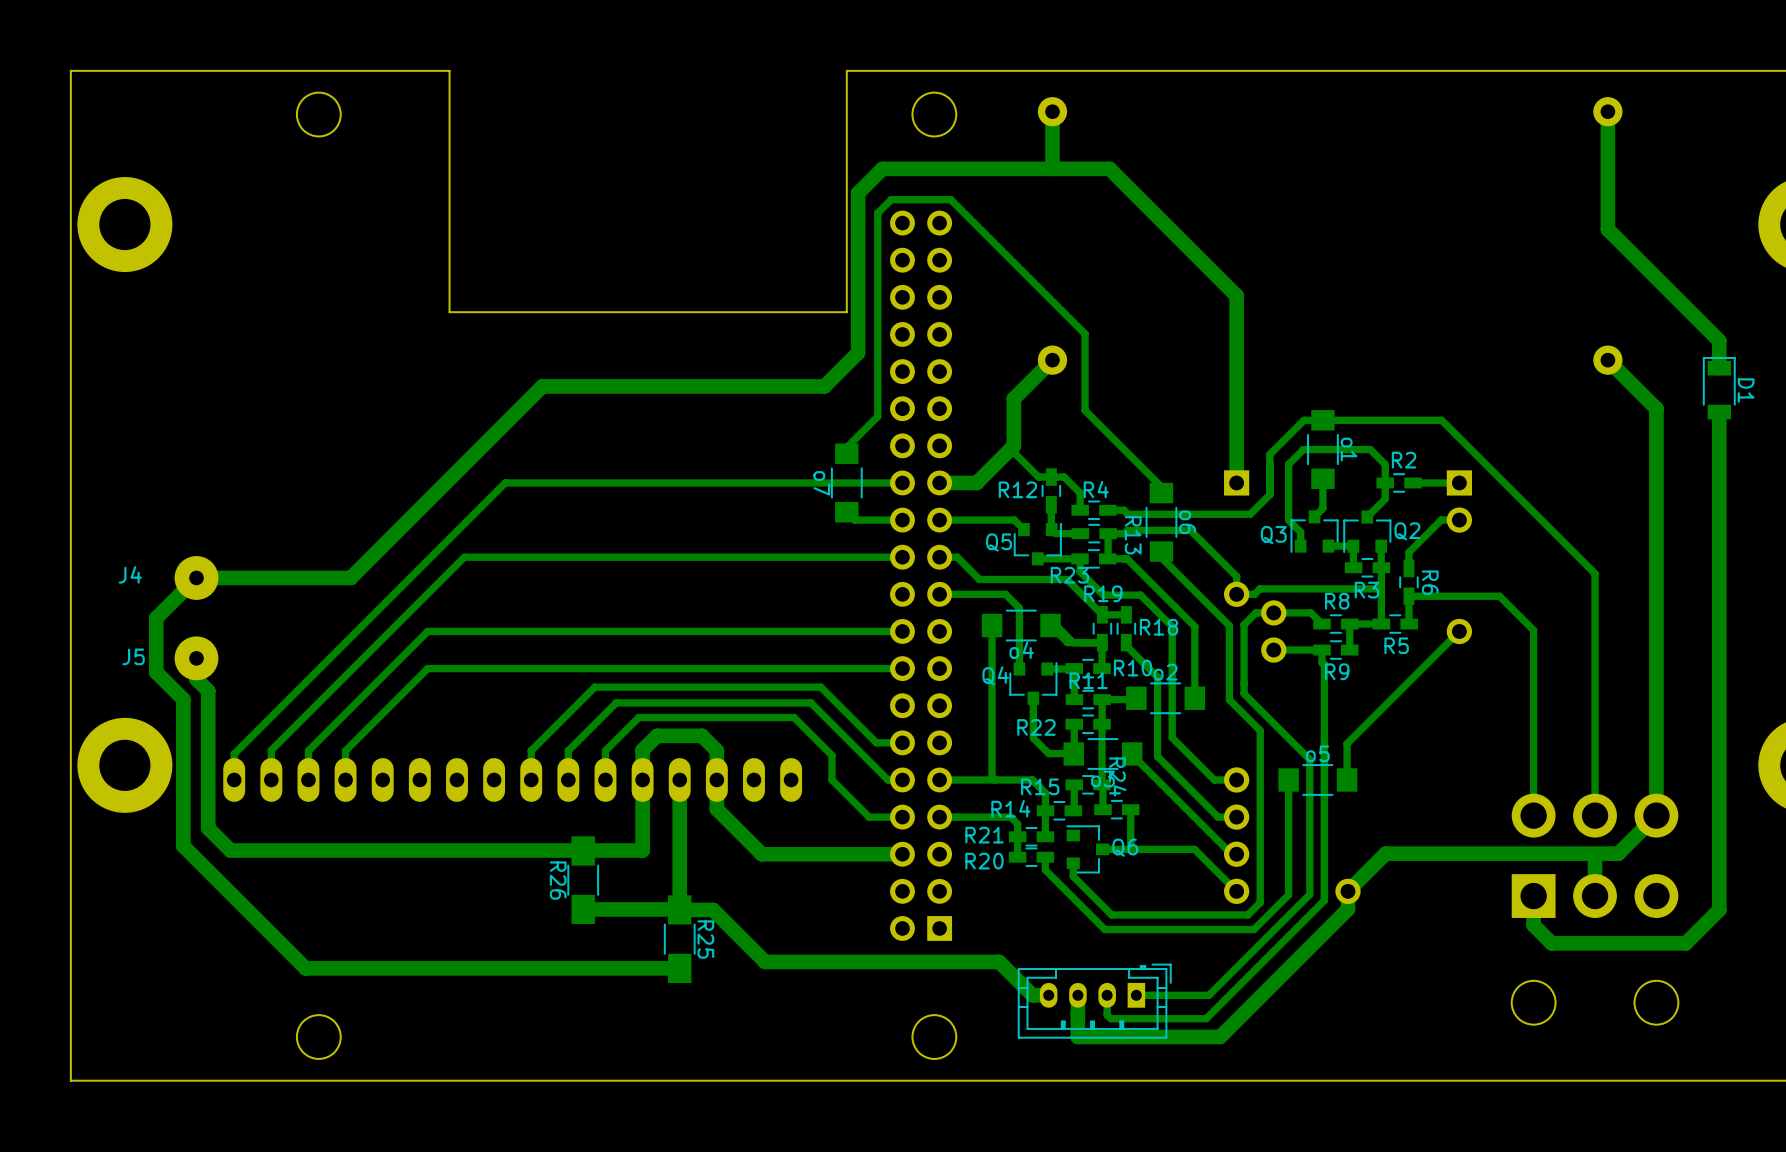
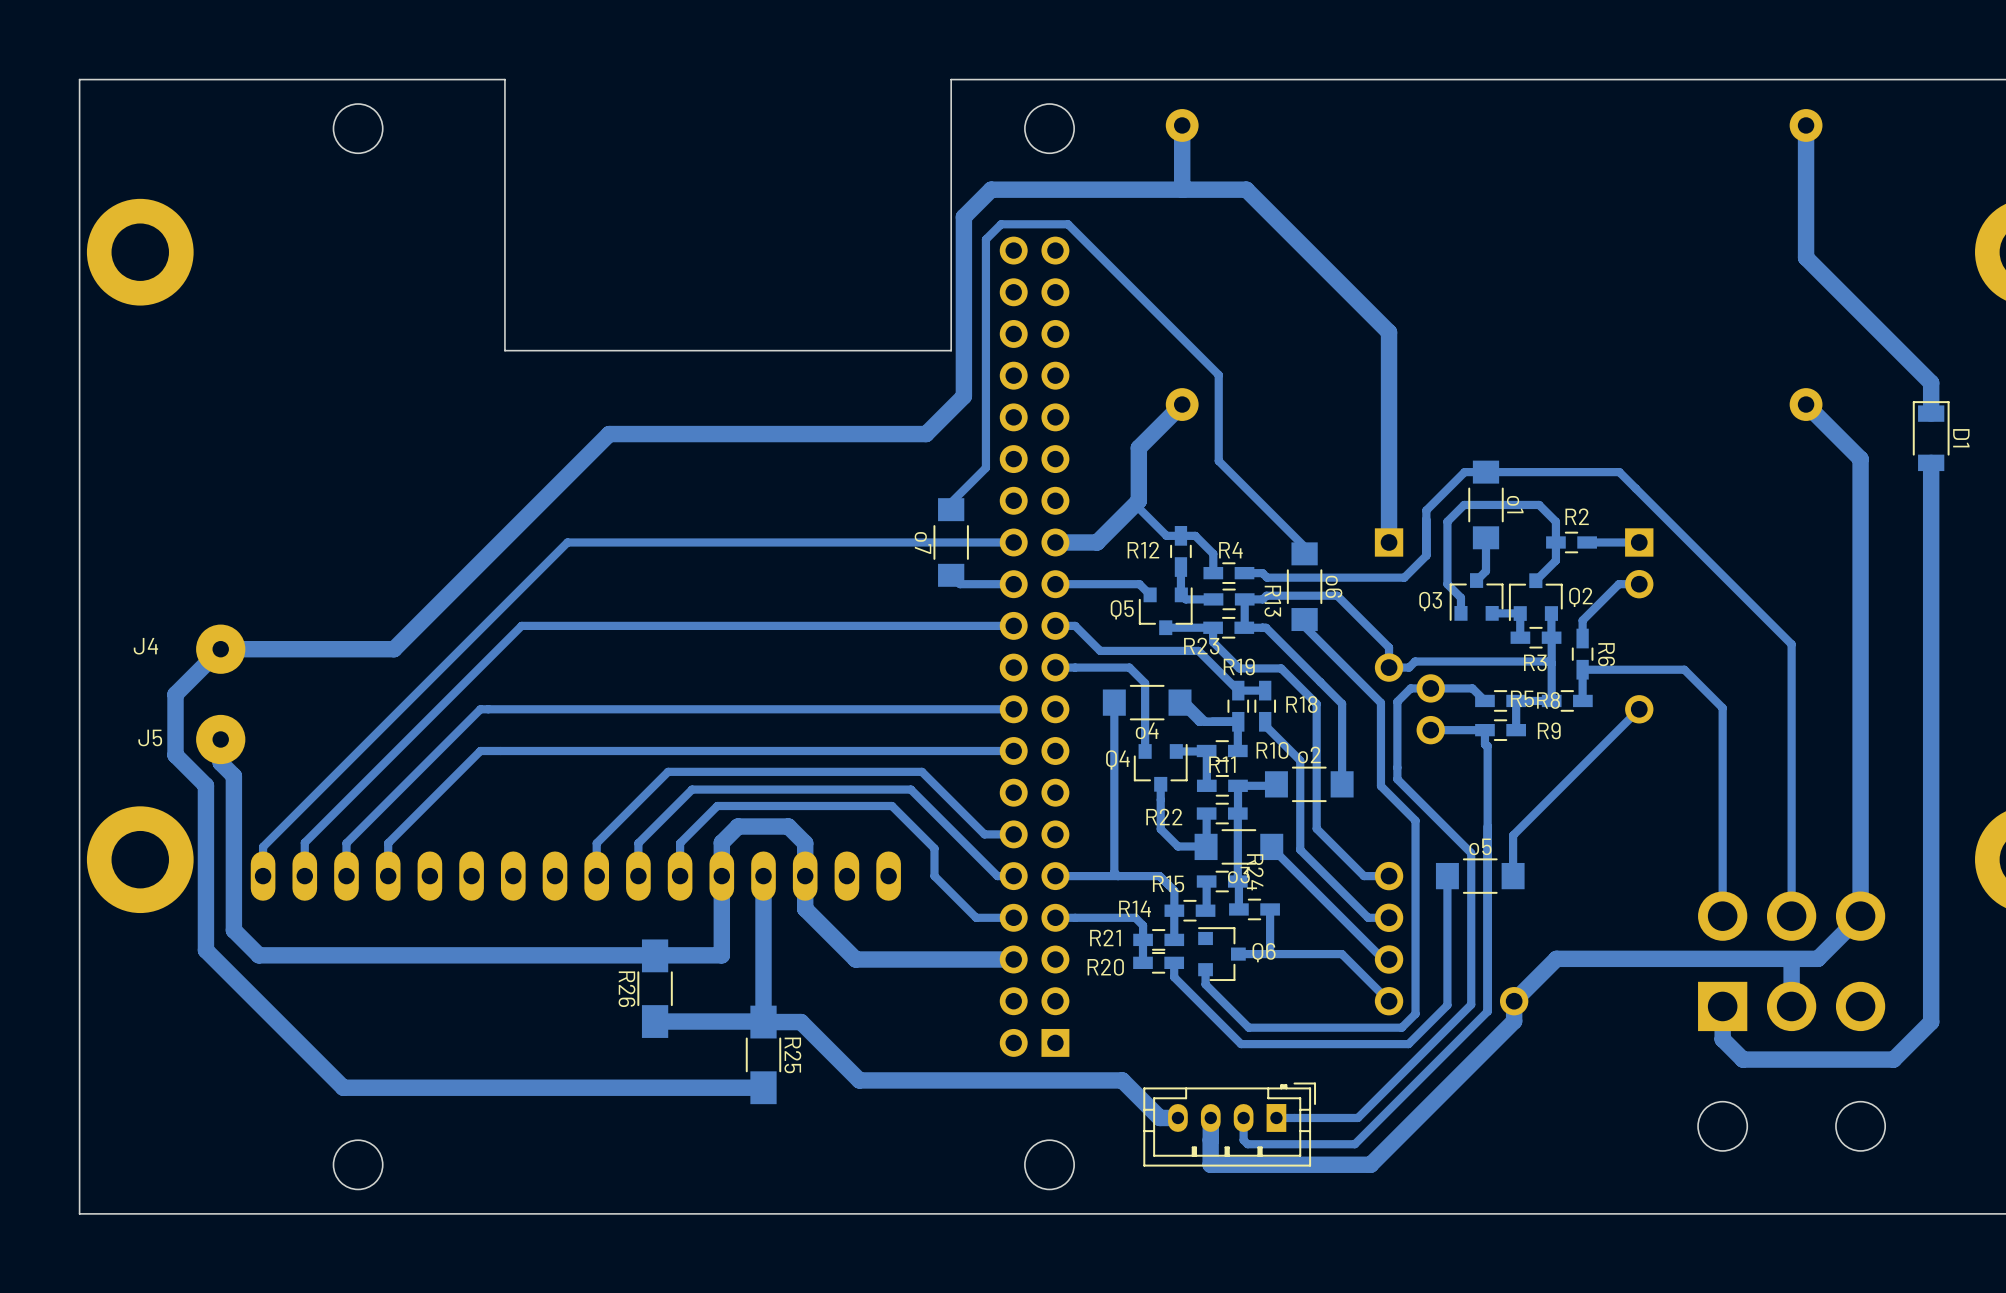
R8 name position: R8 (1337, 601) -> R8 (1548, 700)
R5 name position: R5 (1396, 645) -> R5 (1522, 698)
R9 name position: R9 (1337, 671) -> R9 (1549, 730)

